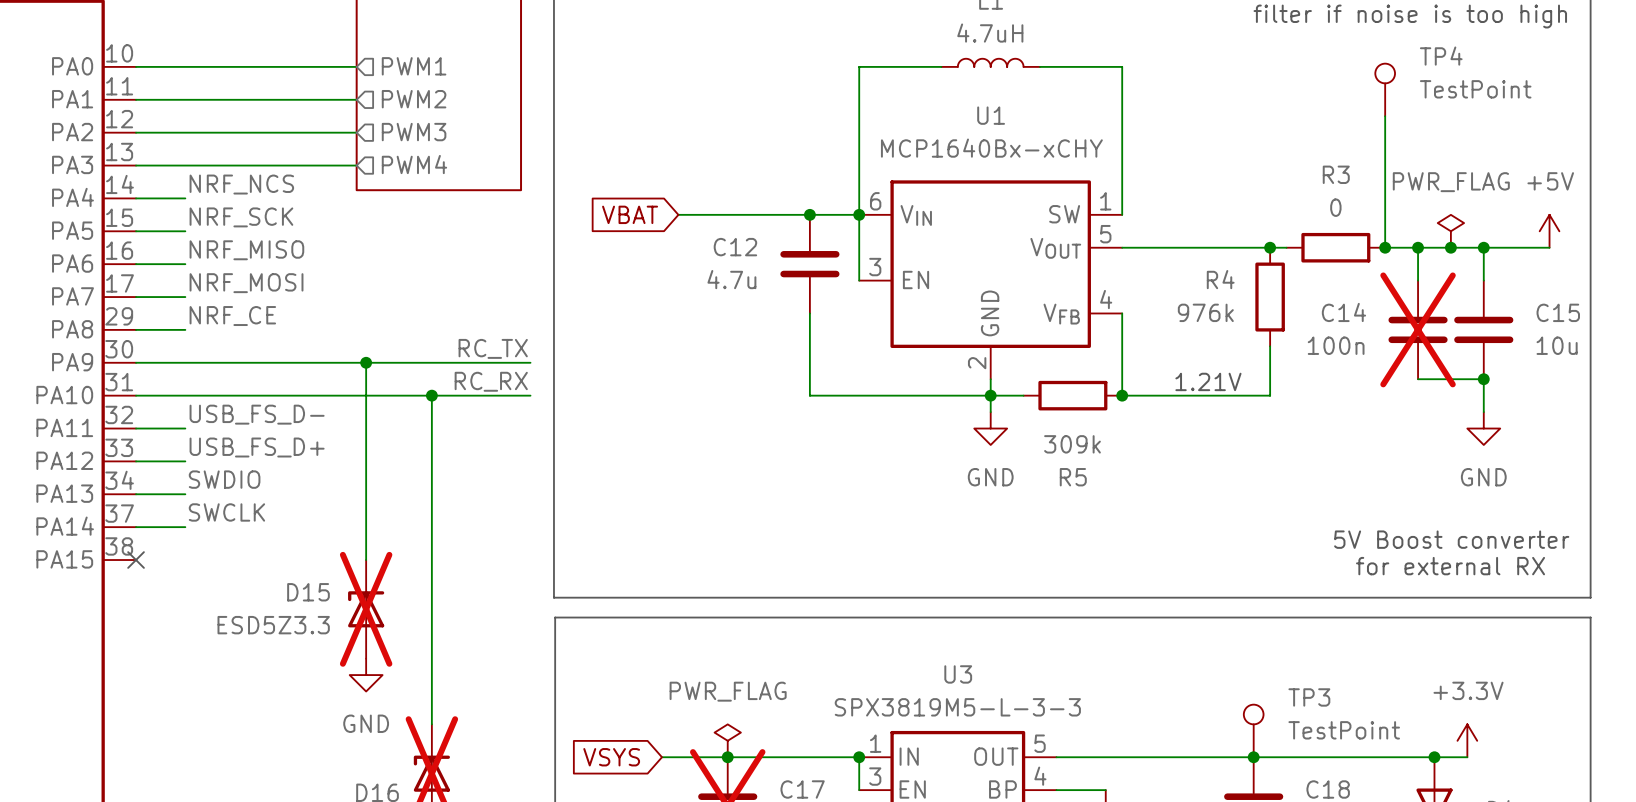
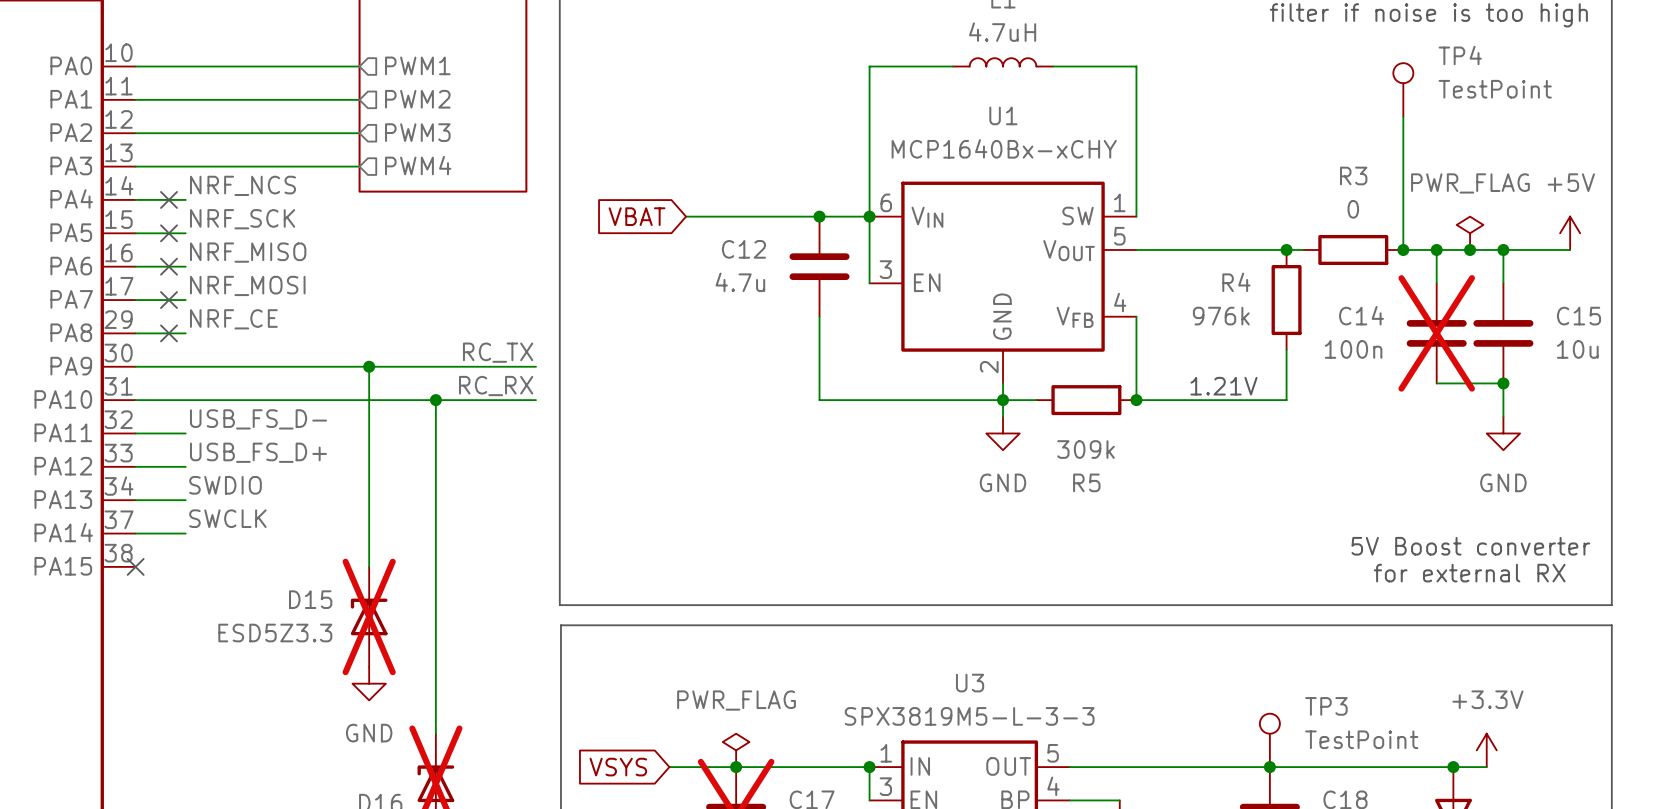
no-connect mark: none -> (169, 199)
no-connect mark: none -> (169, 233)
no-connect mark: none -> (169, 266)
no-connect mark: none -> (169, 300)
no-connect mark: none -> (169, 333)

